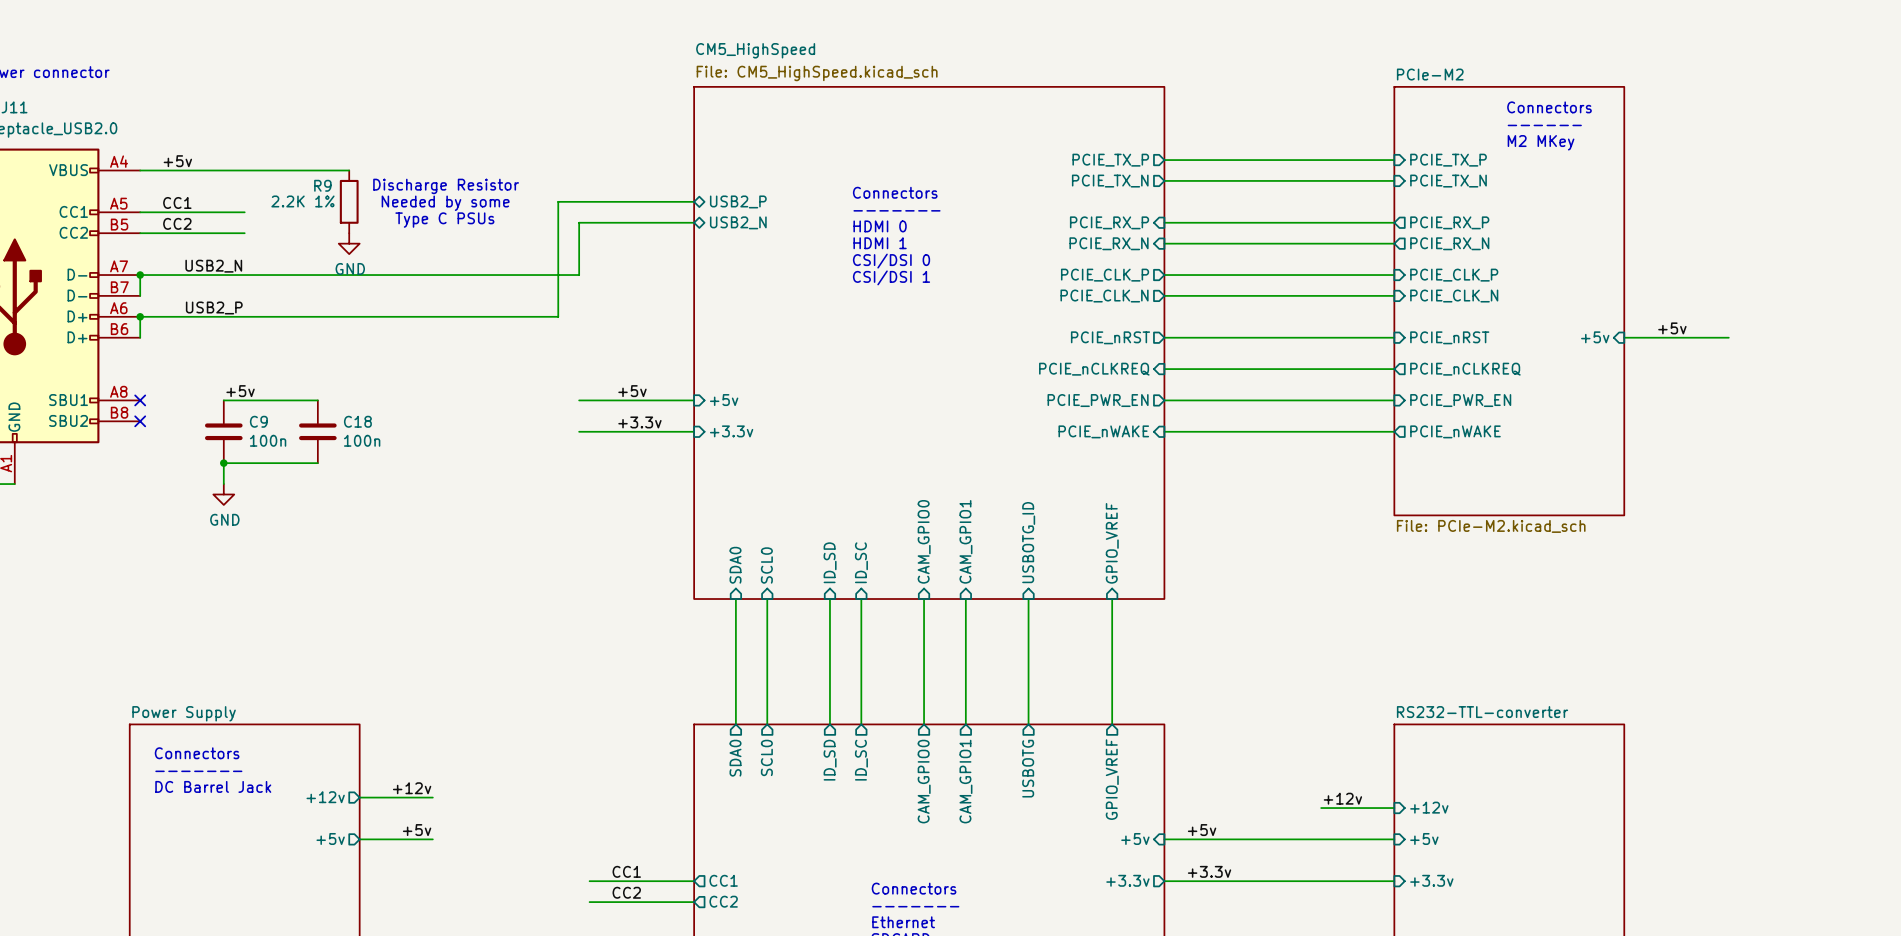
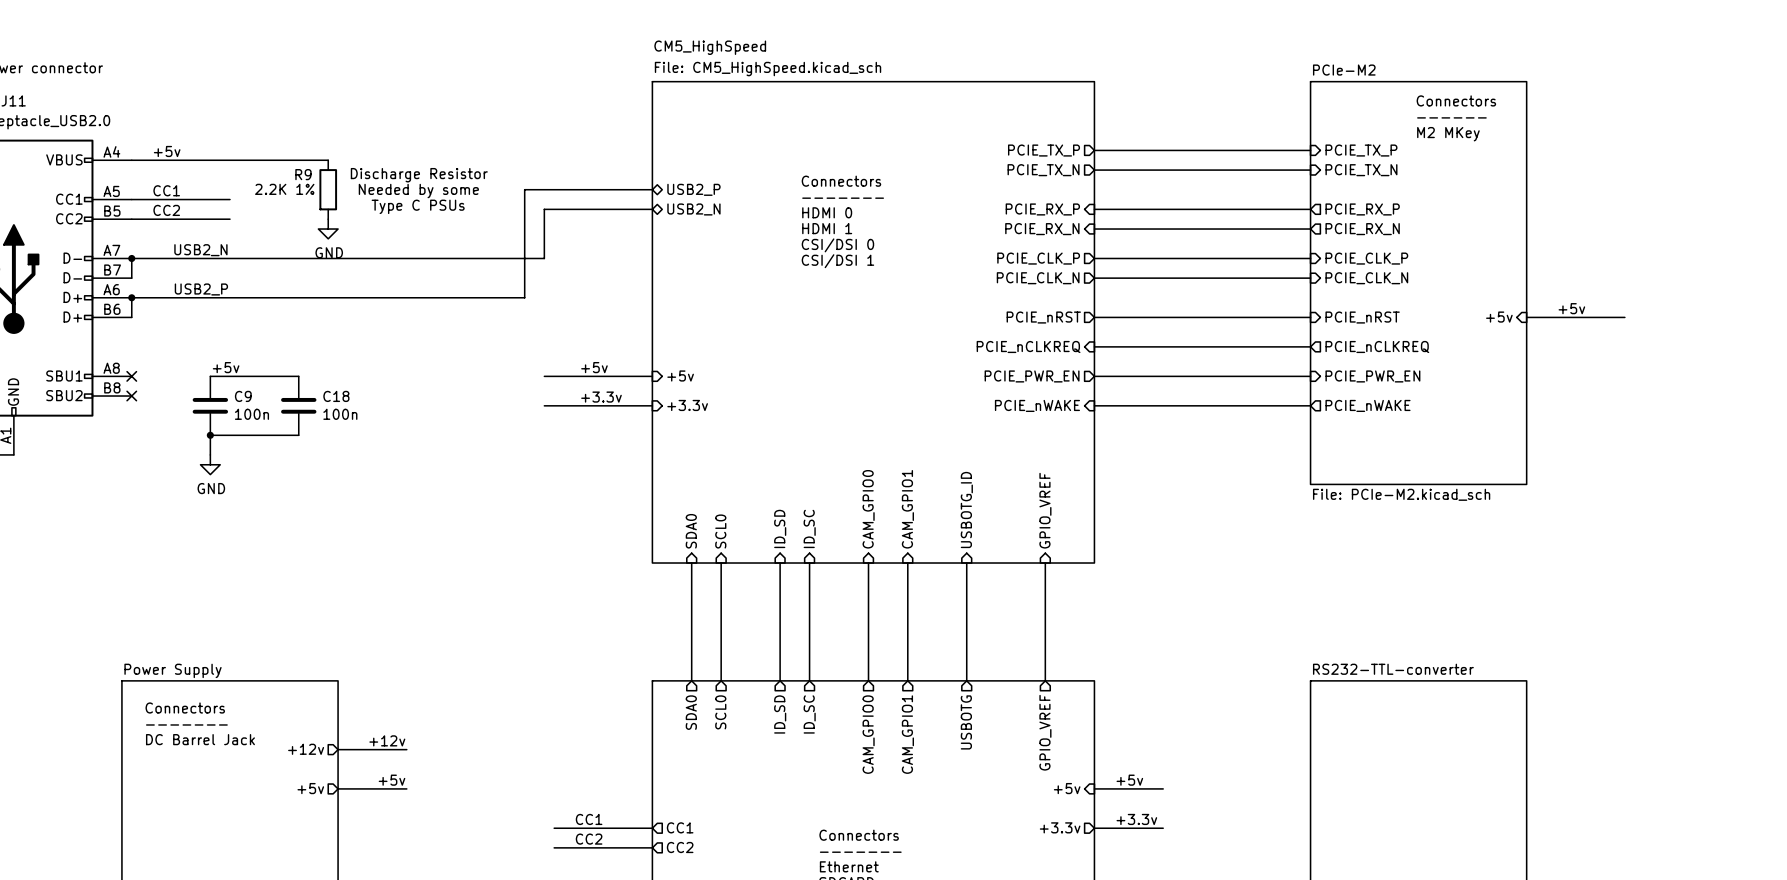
label: +12v (1342, 798) -> none
sheet pin: +12v (1429, 807) -> none
wire: (1321, 808) (1394, 808) -> none
sheet pin: +5v (1424, 838) -> none
wire: (1237, 839) (1394, 839) -> none
sheet pin: +3.3v (1431, 880) -> none
wire: (1237, 881) (1394, 881) -> none

